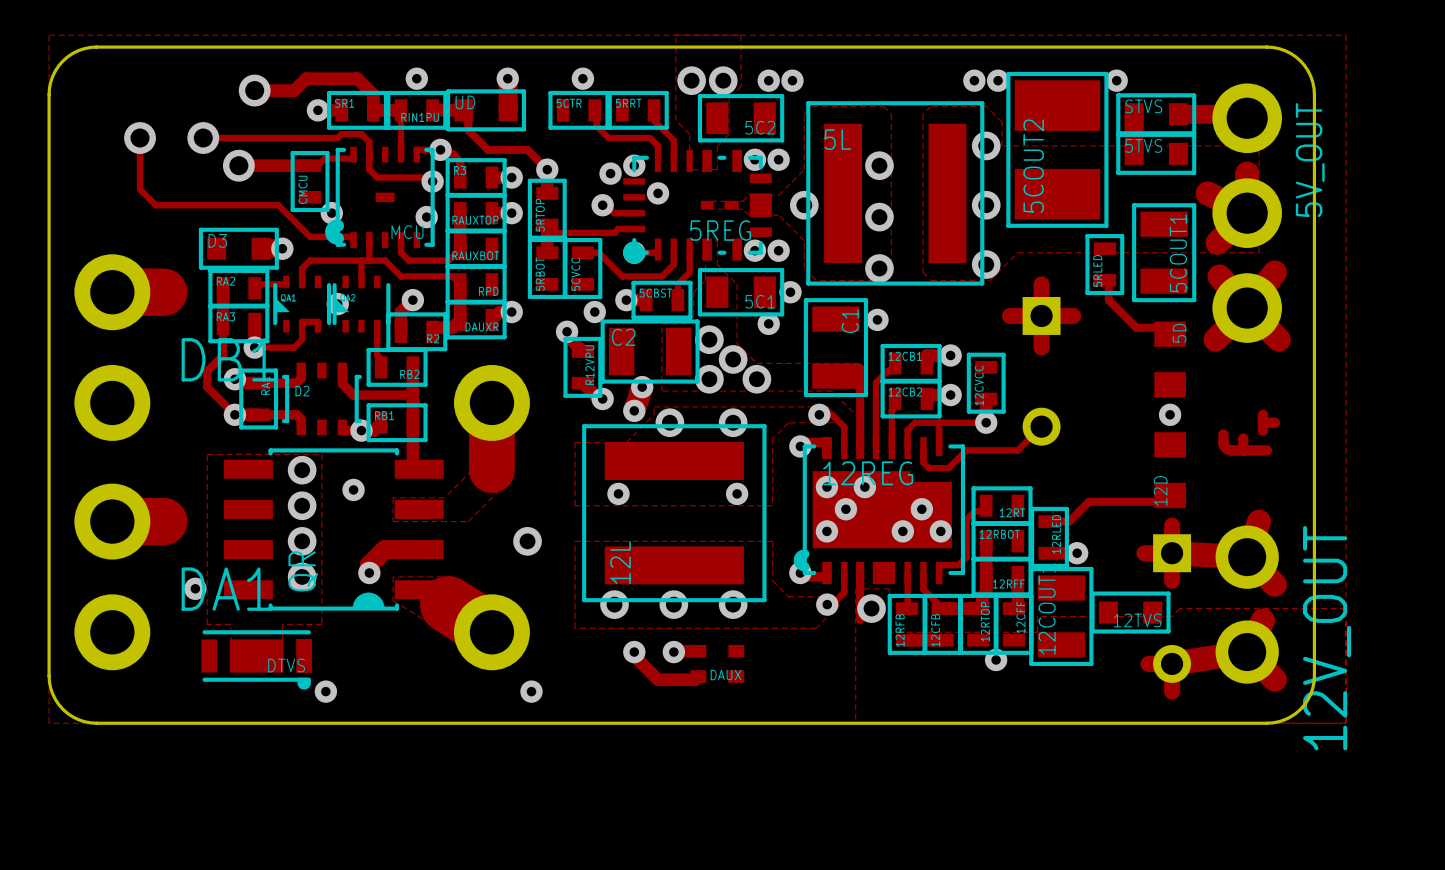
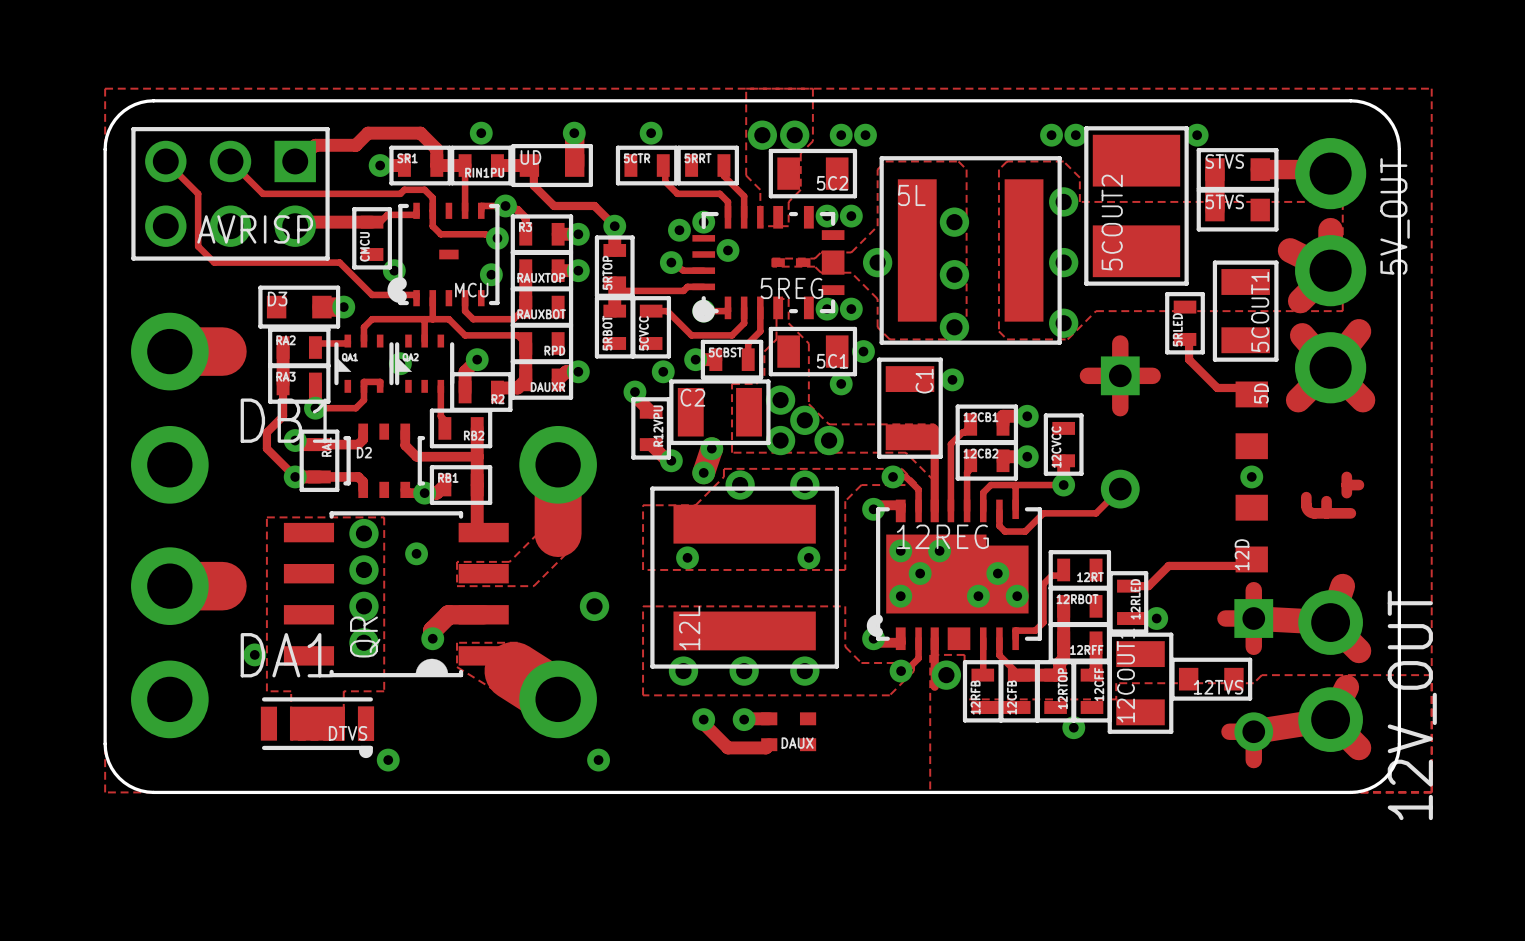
via: (254, 90) -> none
track: none -> (165, 161) (198, 193)
track: none -> (230, 161) (262, 193)
via: (140, 138) -> none
AVRISP: none -> (230, 193)
via: (203, 138) -> none
via: (238, 165) -> none

